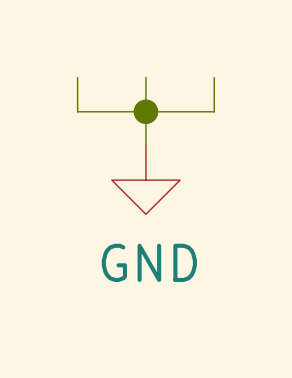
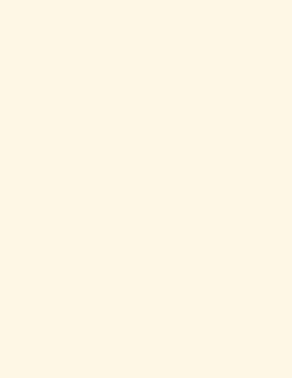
wire: (77, 77) (77, 111) (214, 111) (214, 77) -> none
wire: (145, 77) (145, 145) -> none
junction: (145, 111) -> none
power symbol: GND (145, 180) -> none

